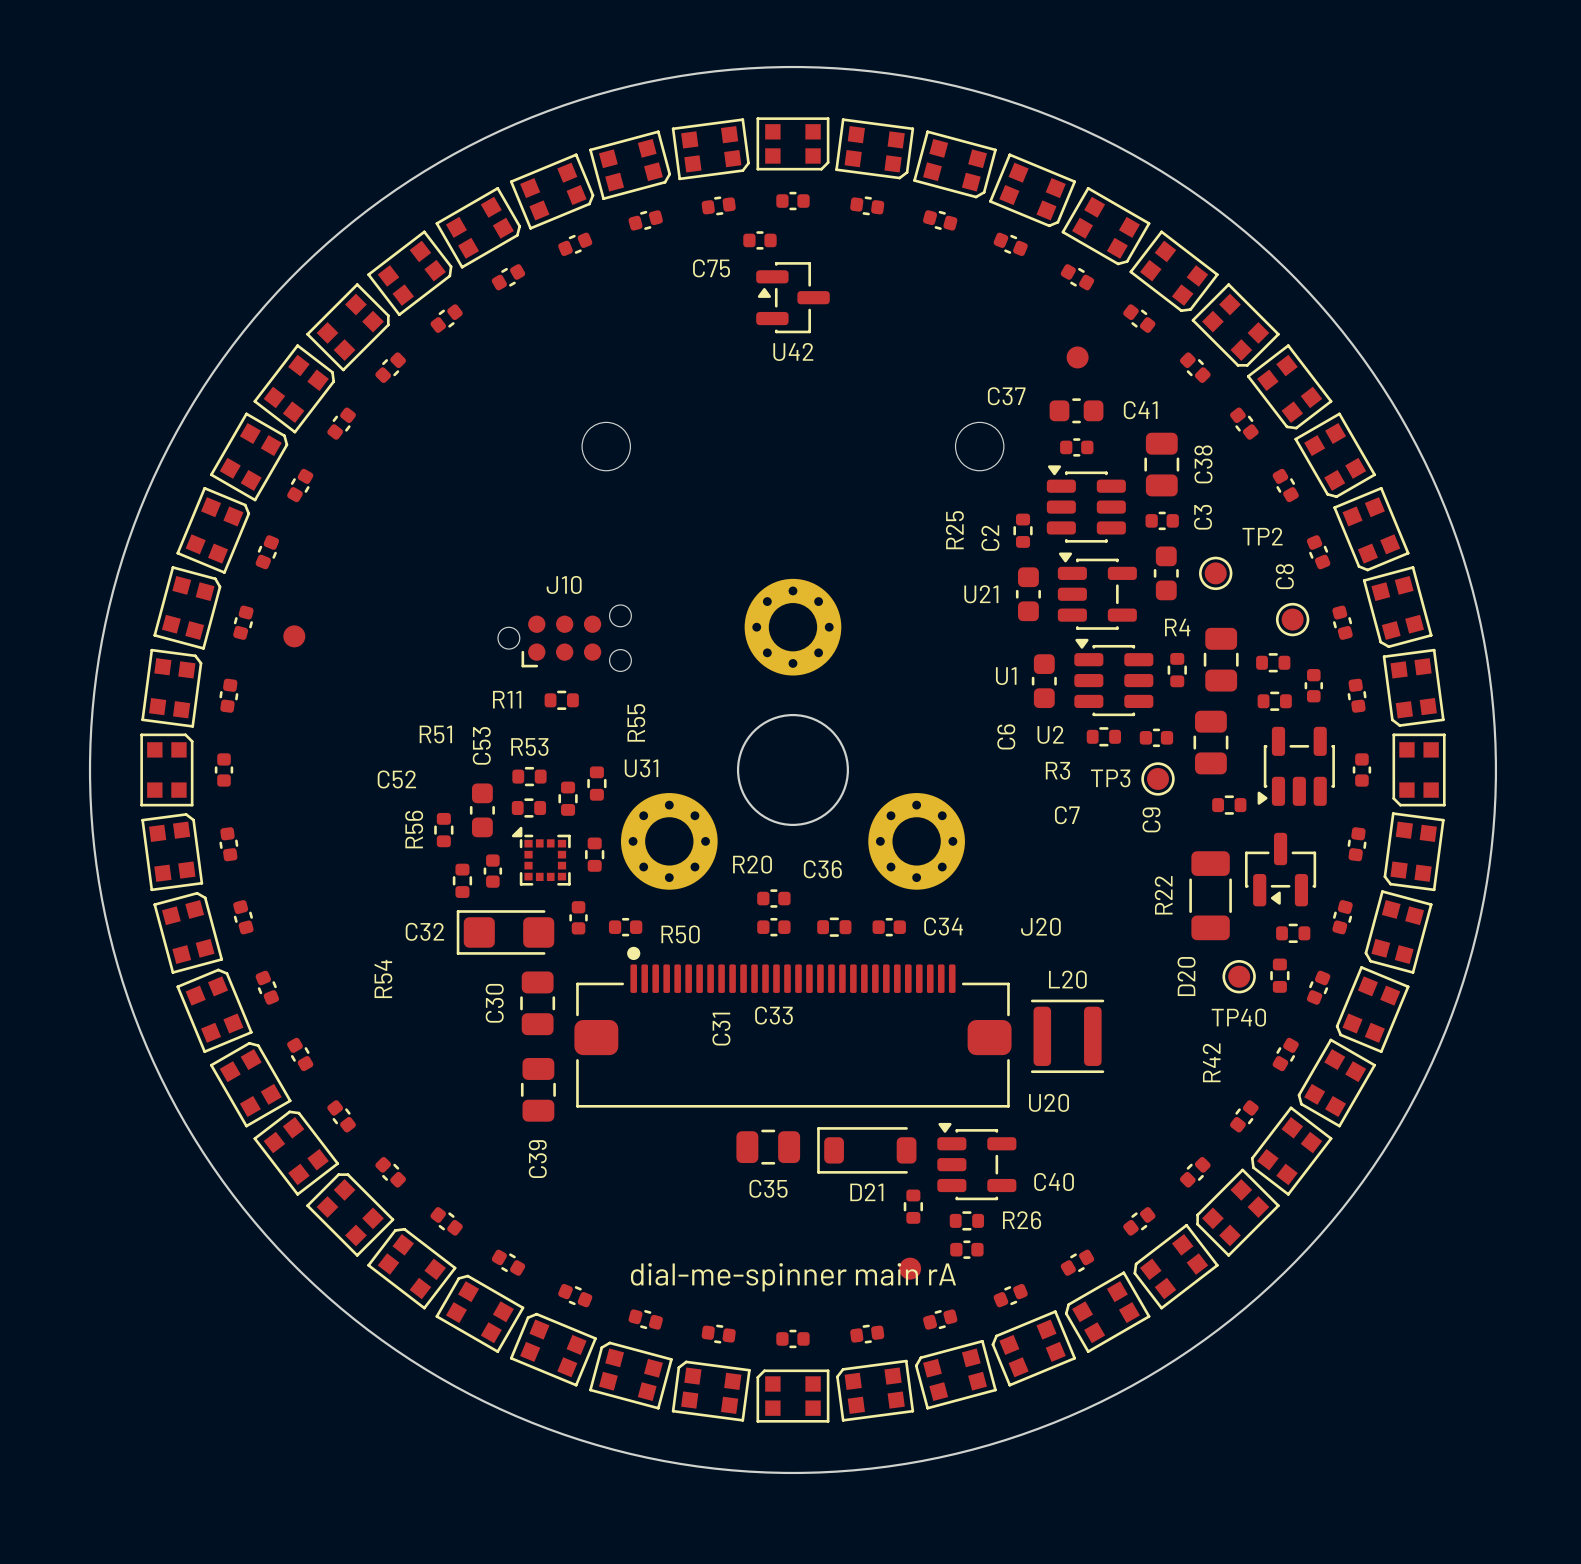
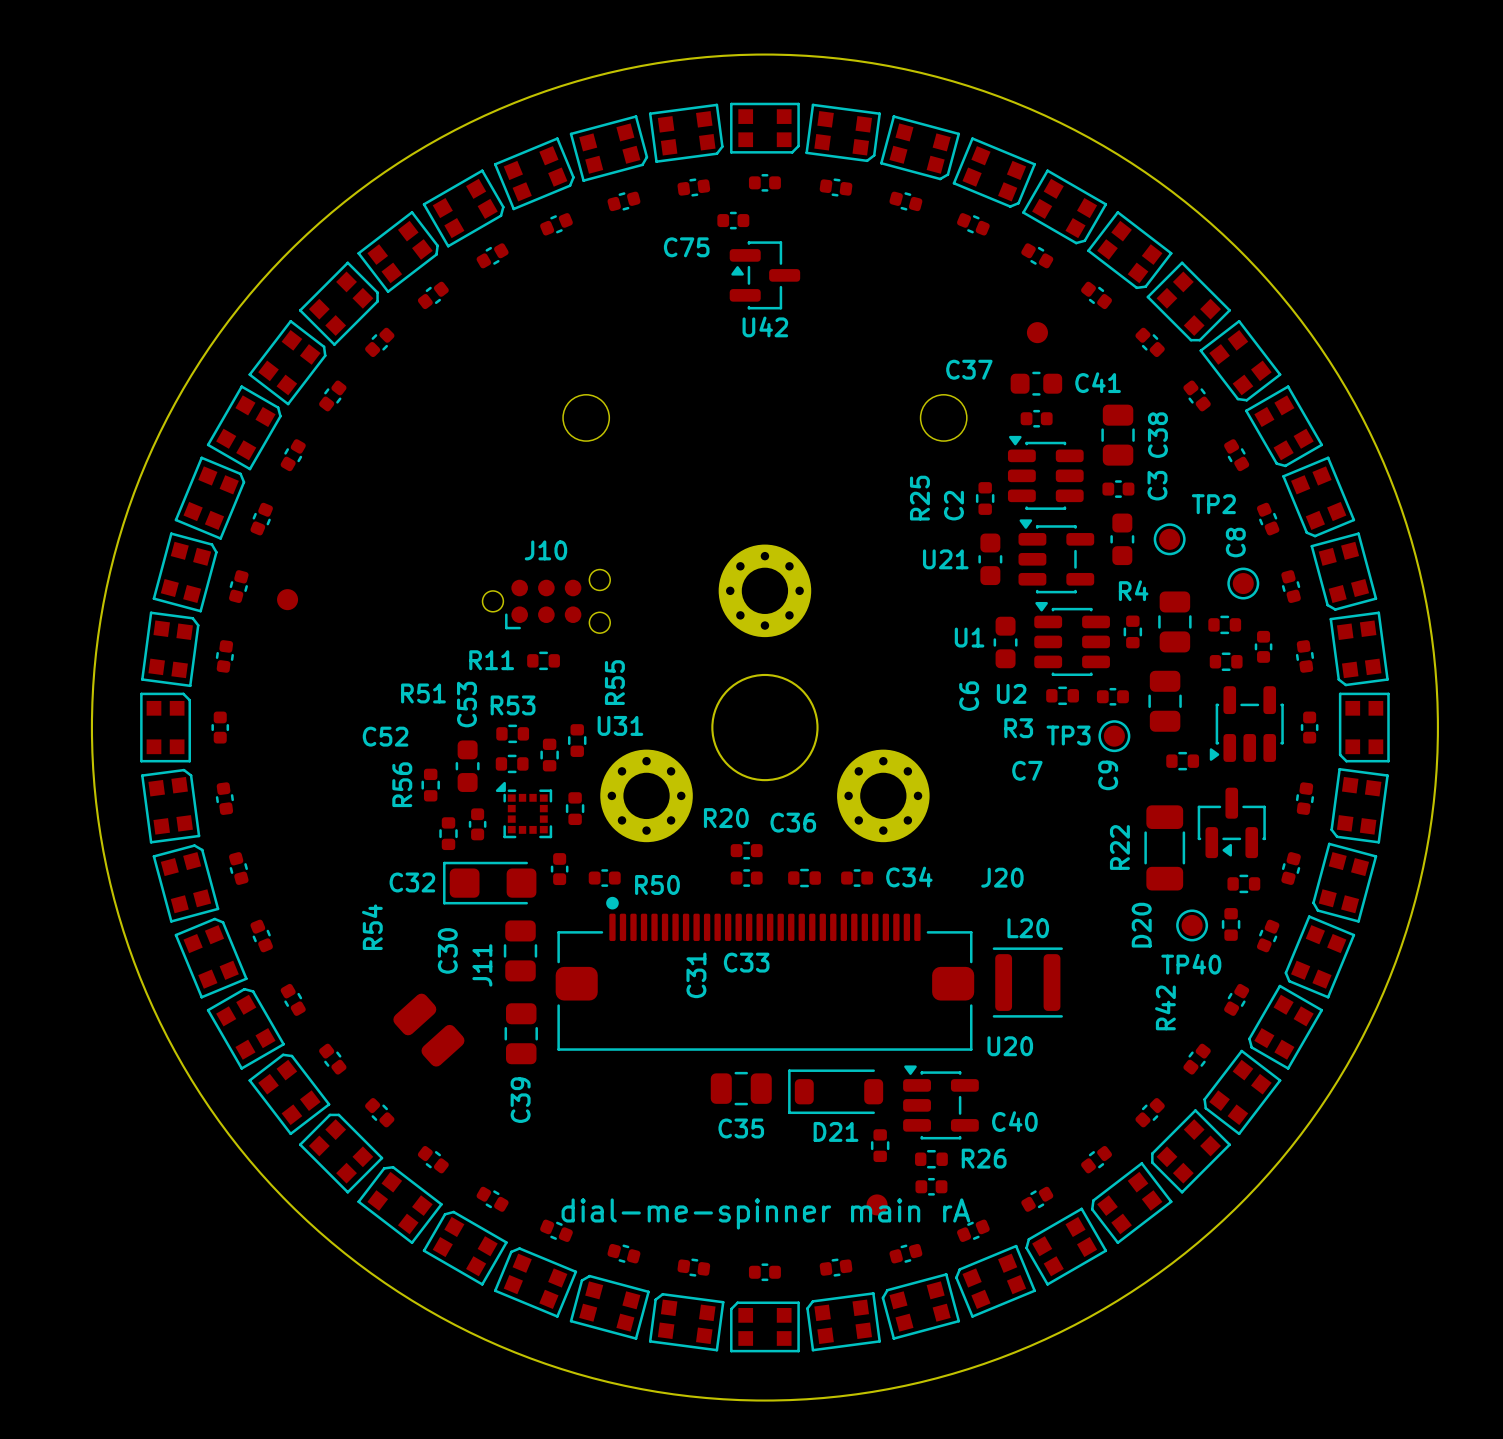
C30 name position: C30 (494, 1003) -> C30 (447, 950)
J11: none -> (428, 1030)

